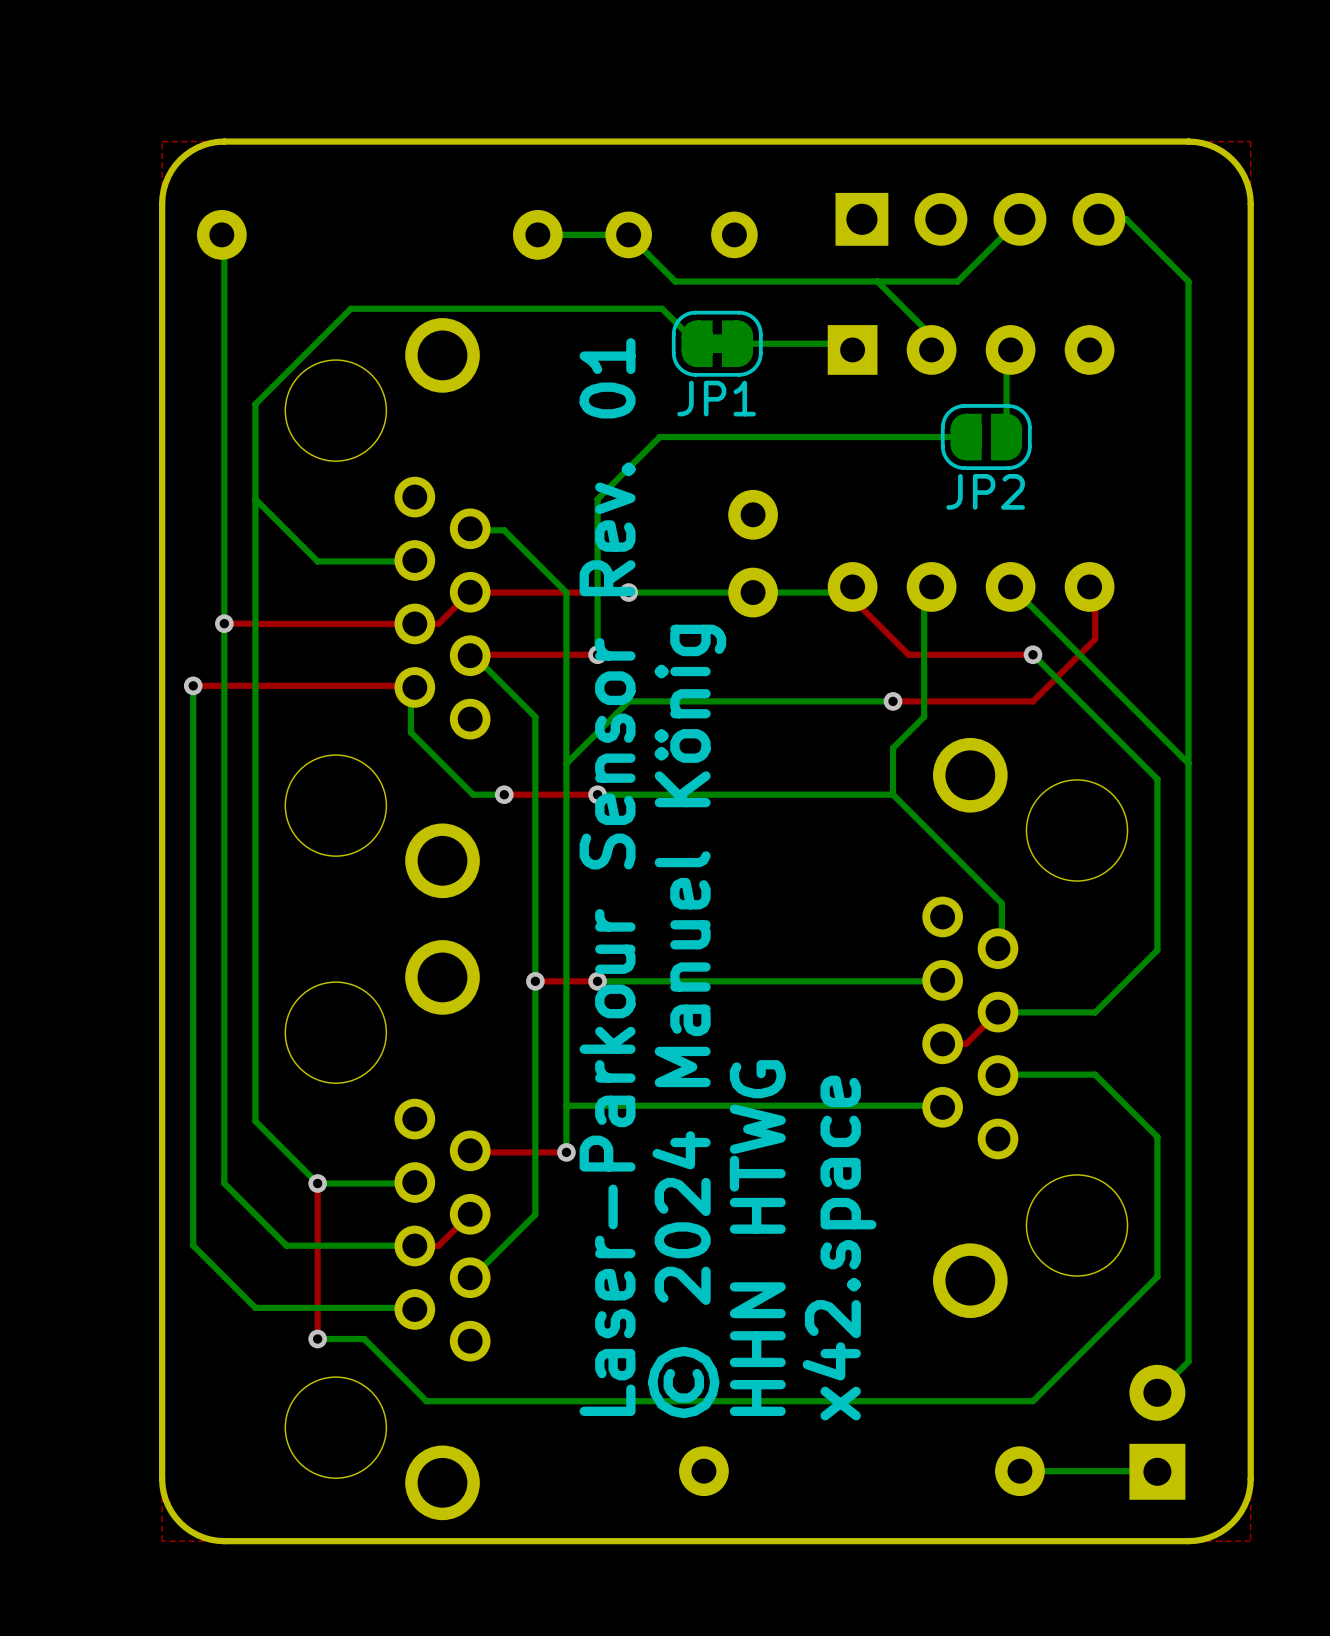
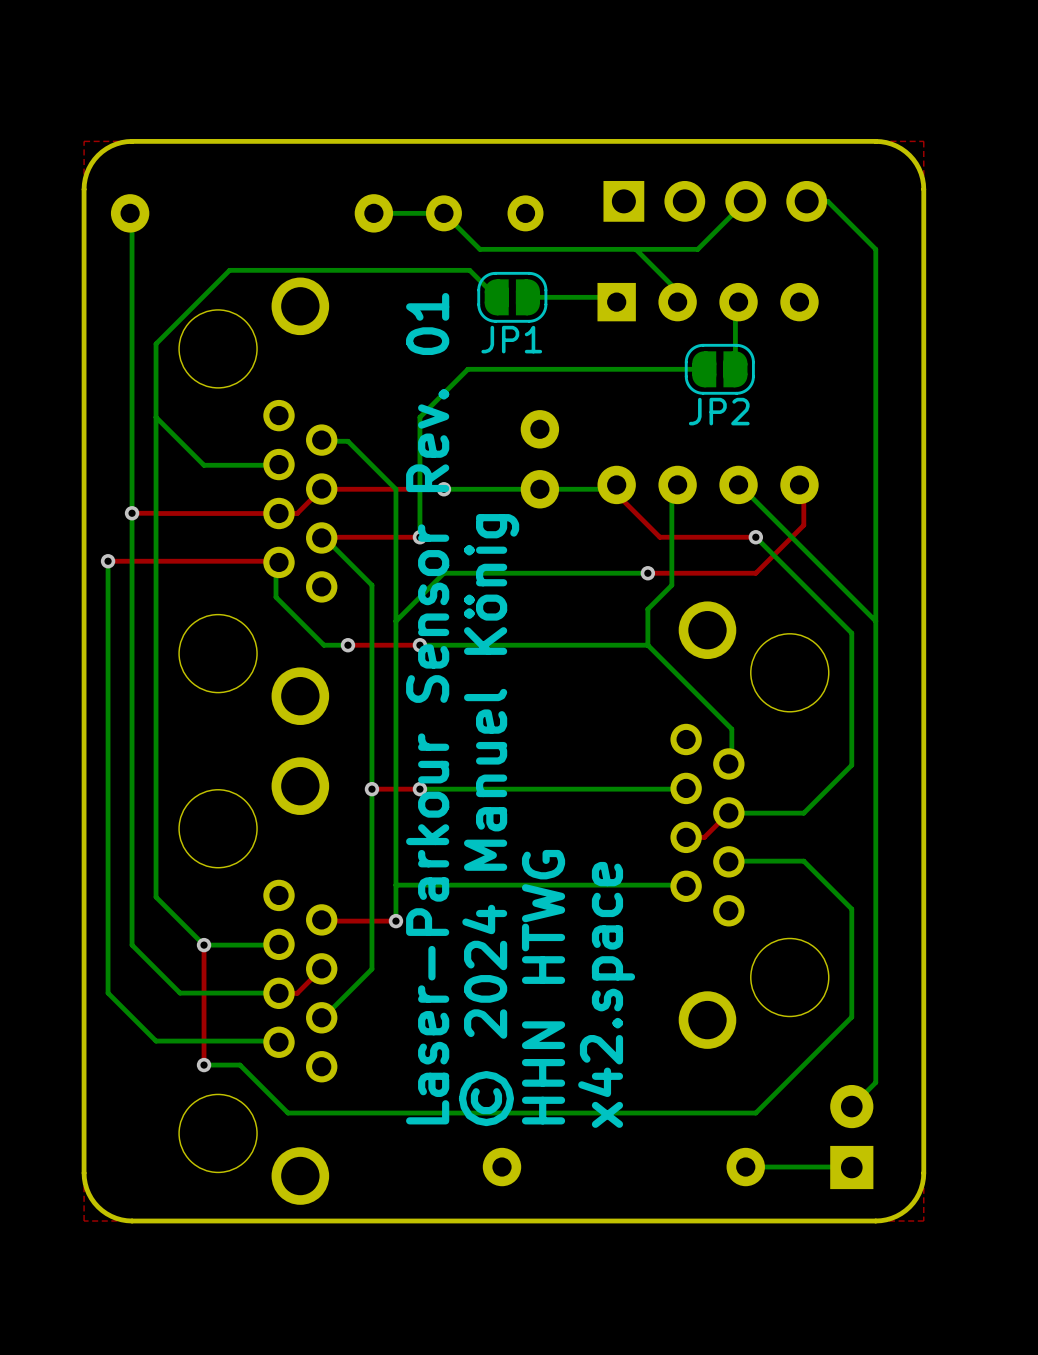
JP1 footprint: [671, 310, 763, 377] -> [477, 271, 548, 323]

